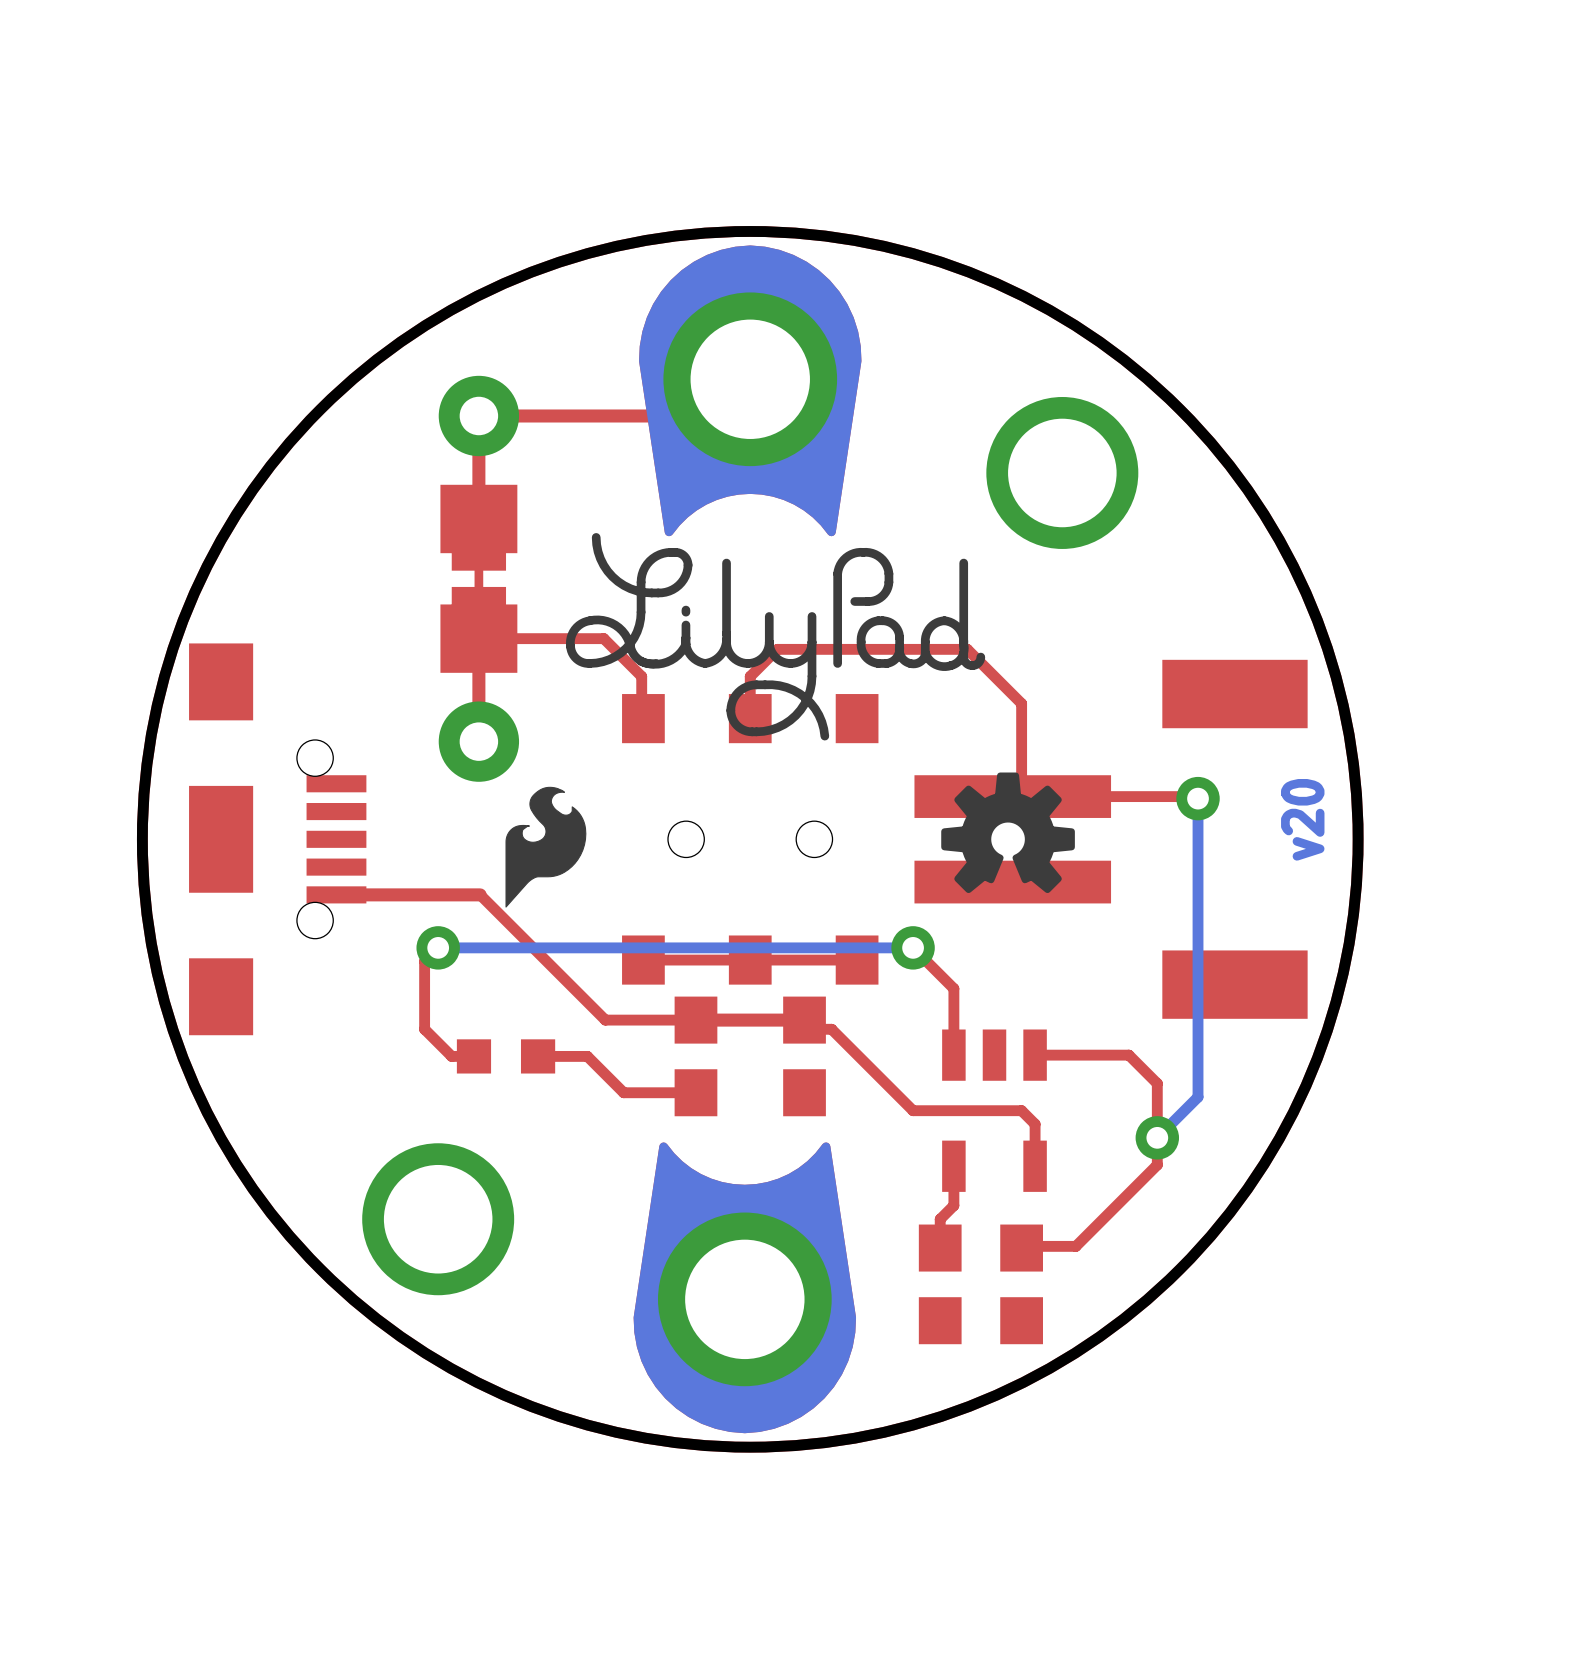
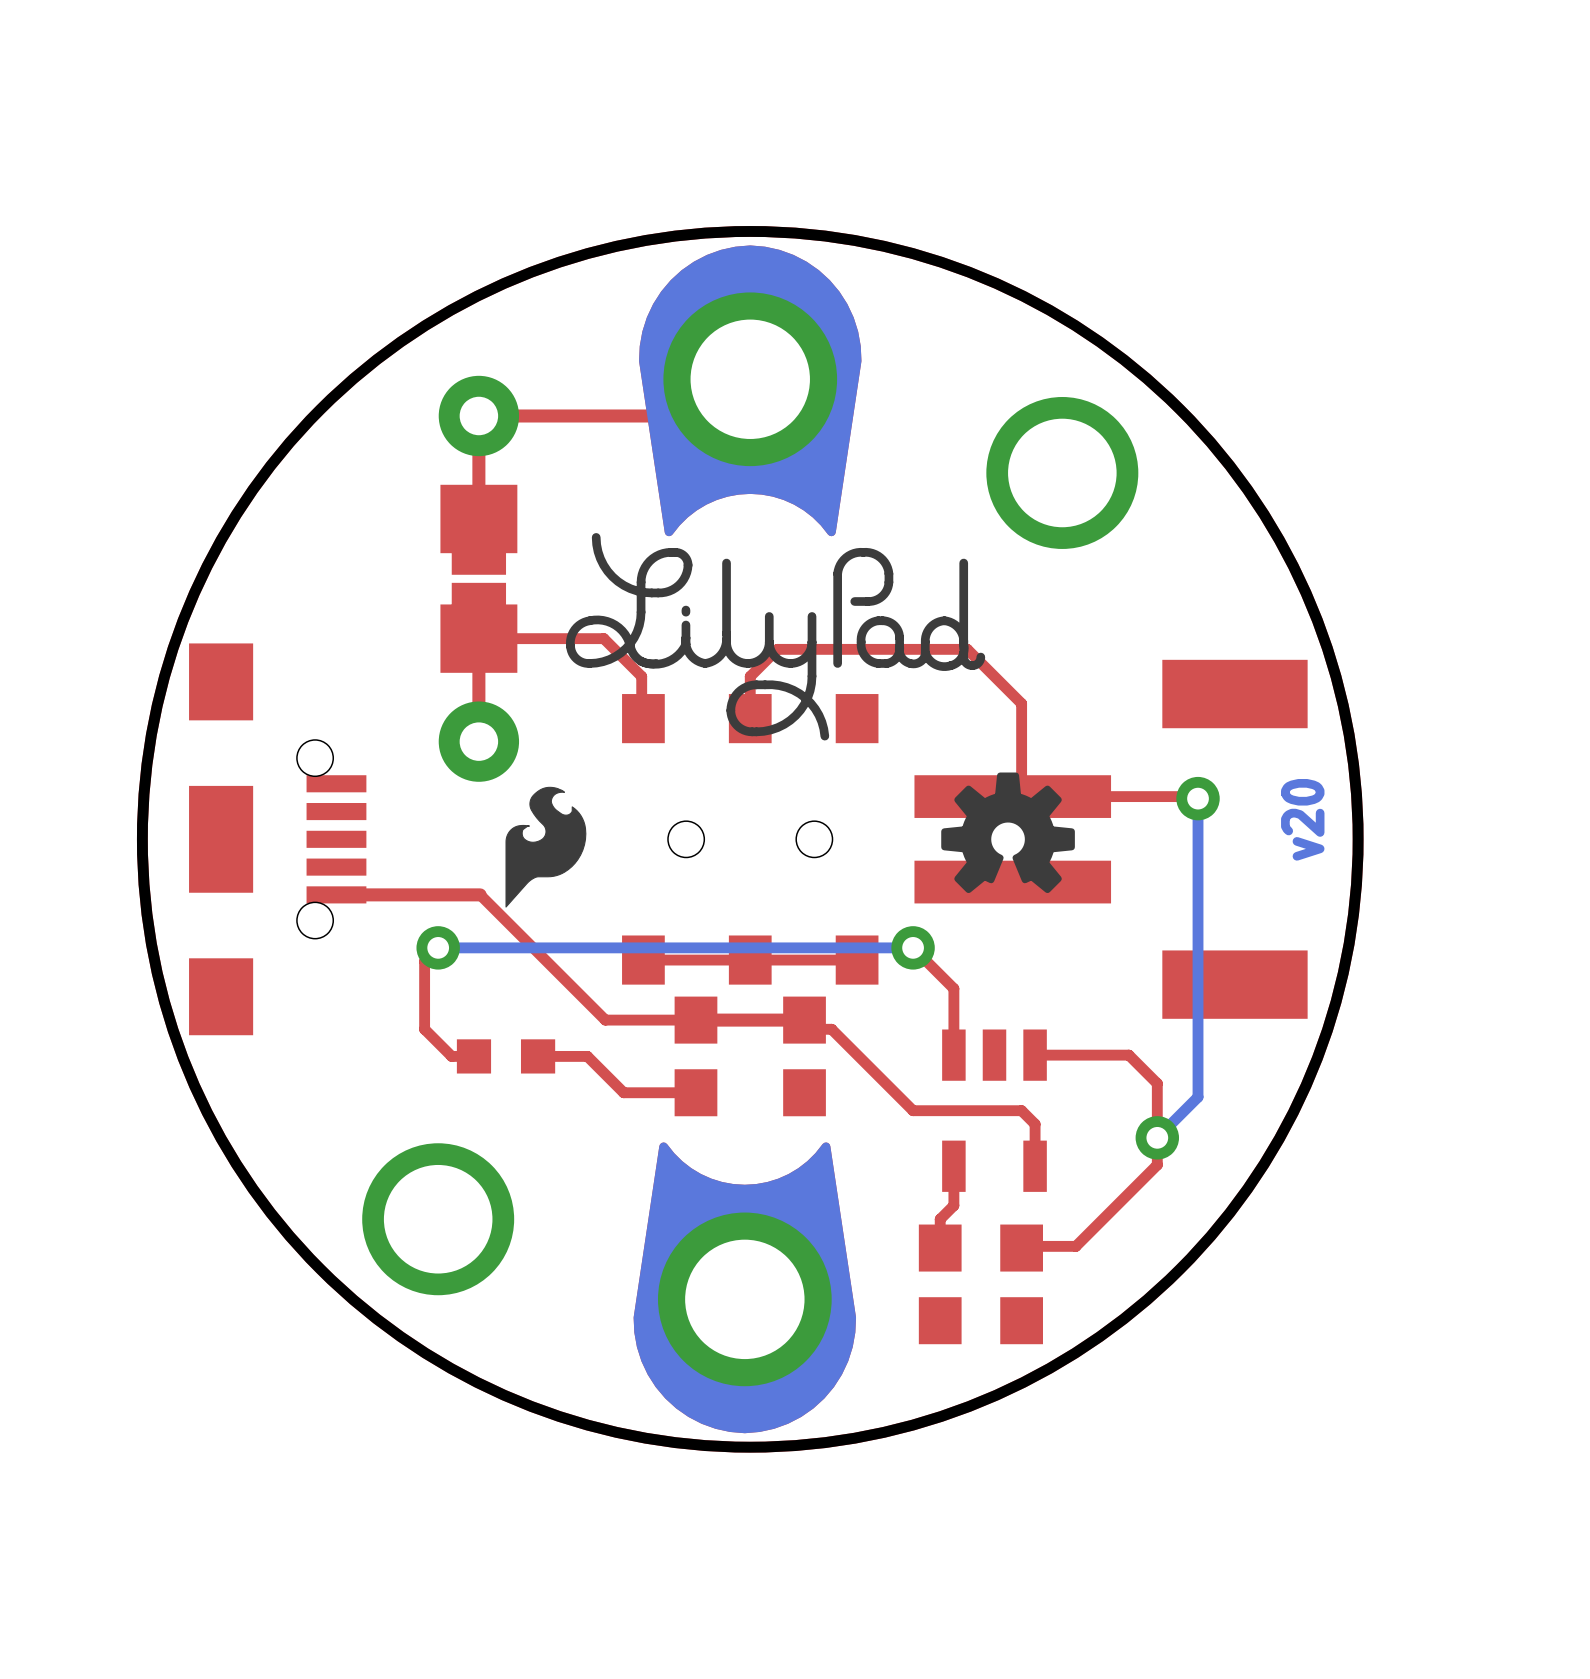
part footprint: [451, 543, 507, 615] -> [451, 547, 507, 610]

